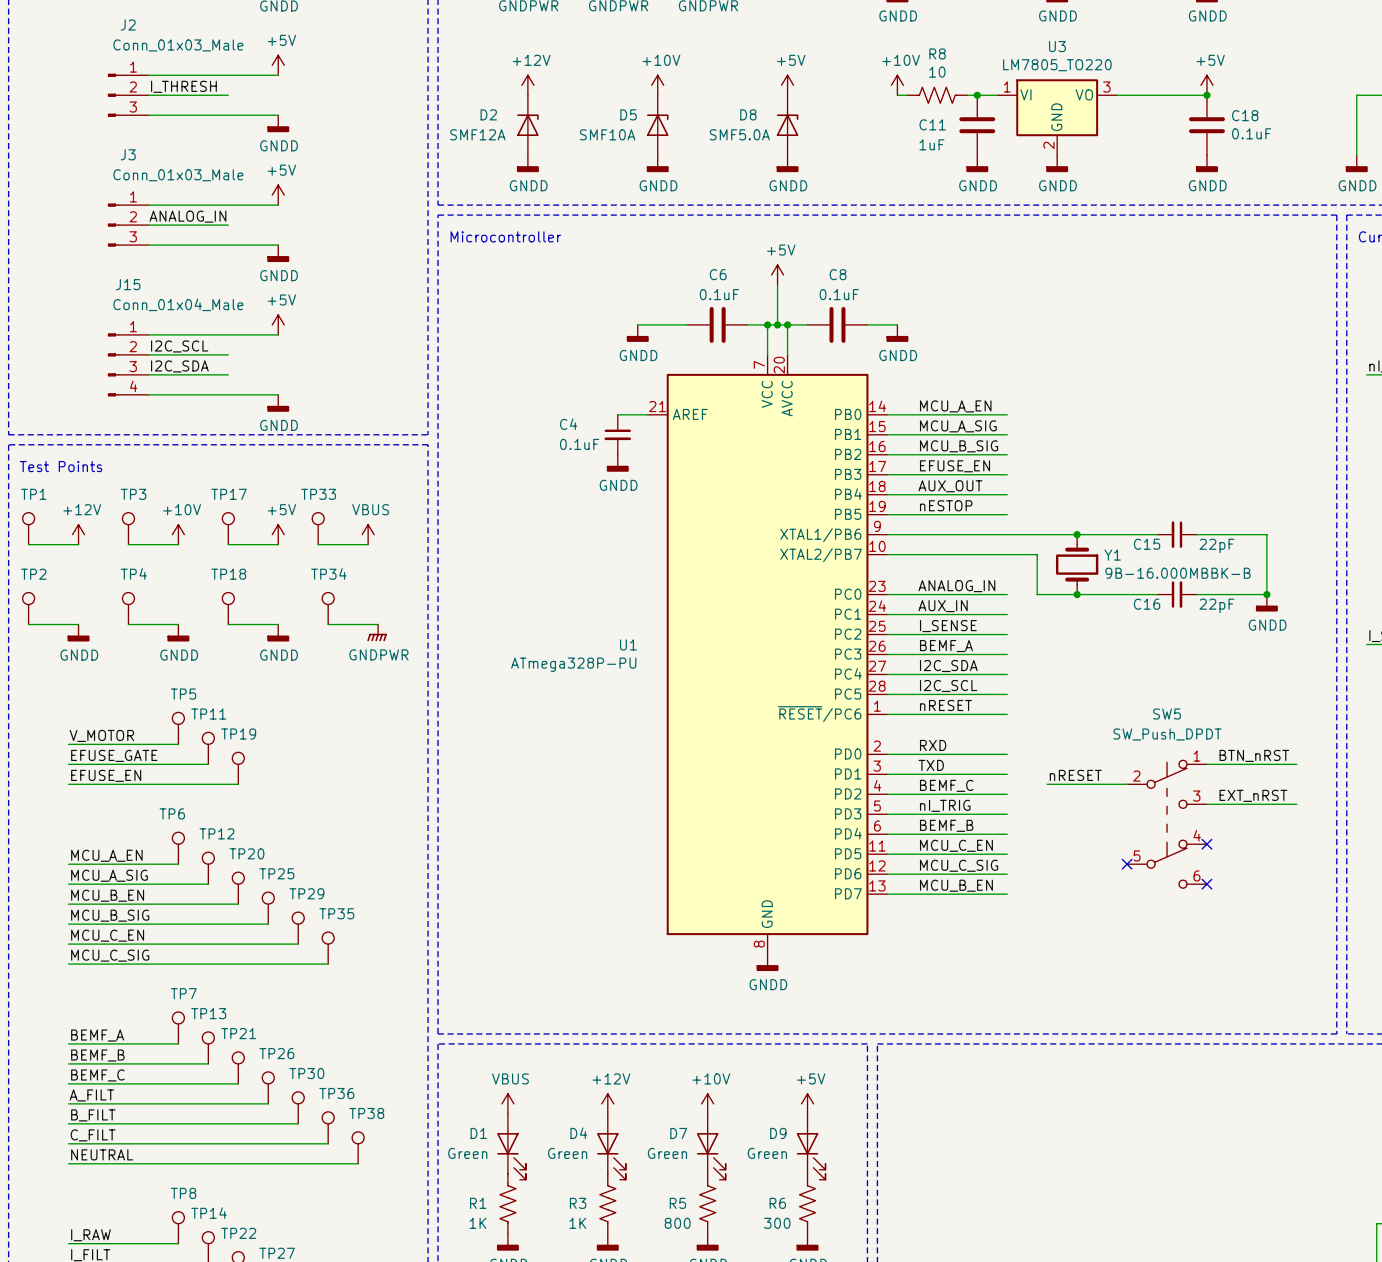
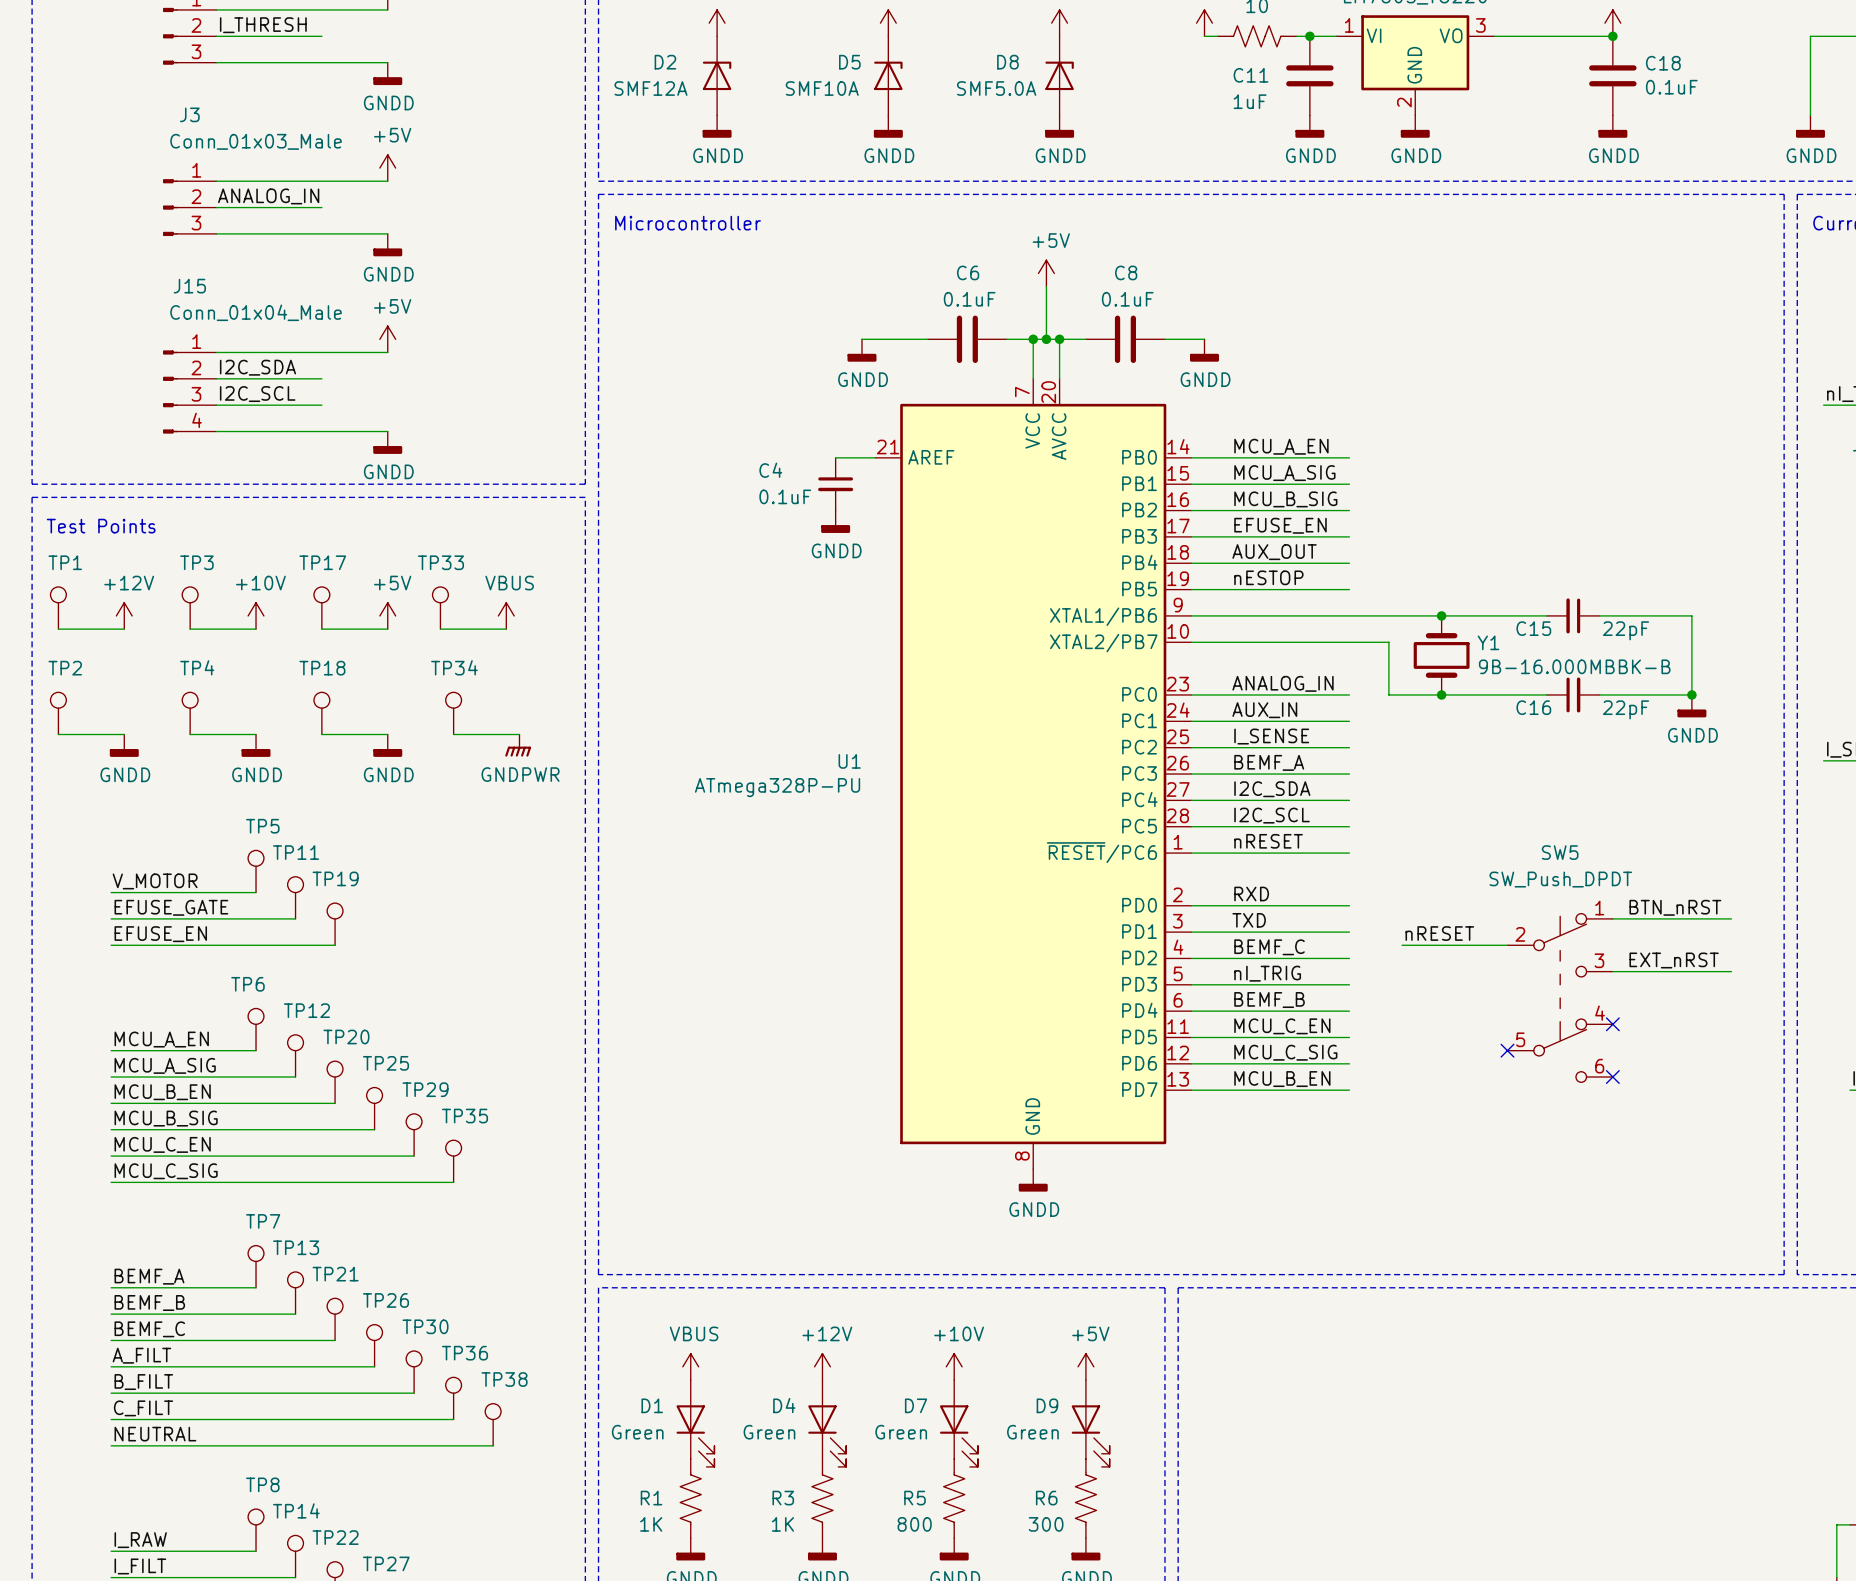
label: I2C_SCL (179, 346) -> I2C_SDA (257, 367)
label: I2C_SDA (179, 366) -> I2C_SCL (257, 394)

